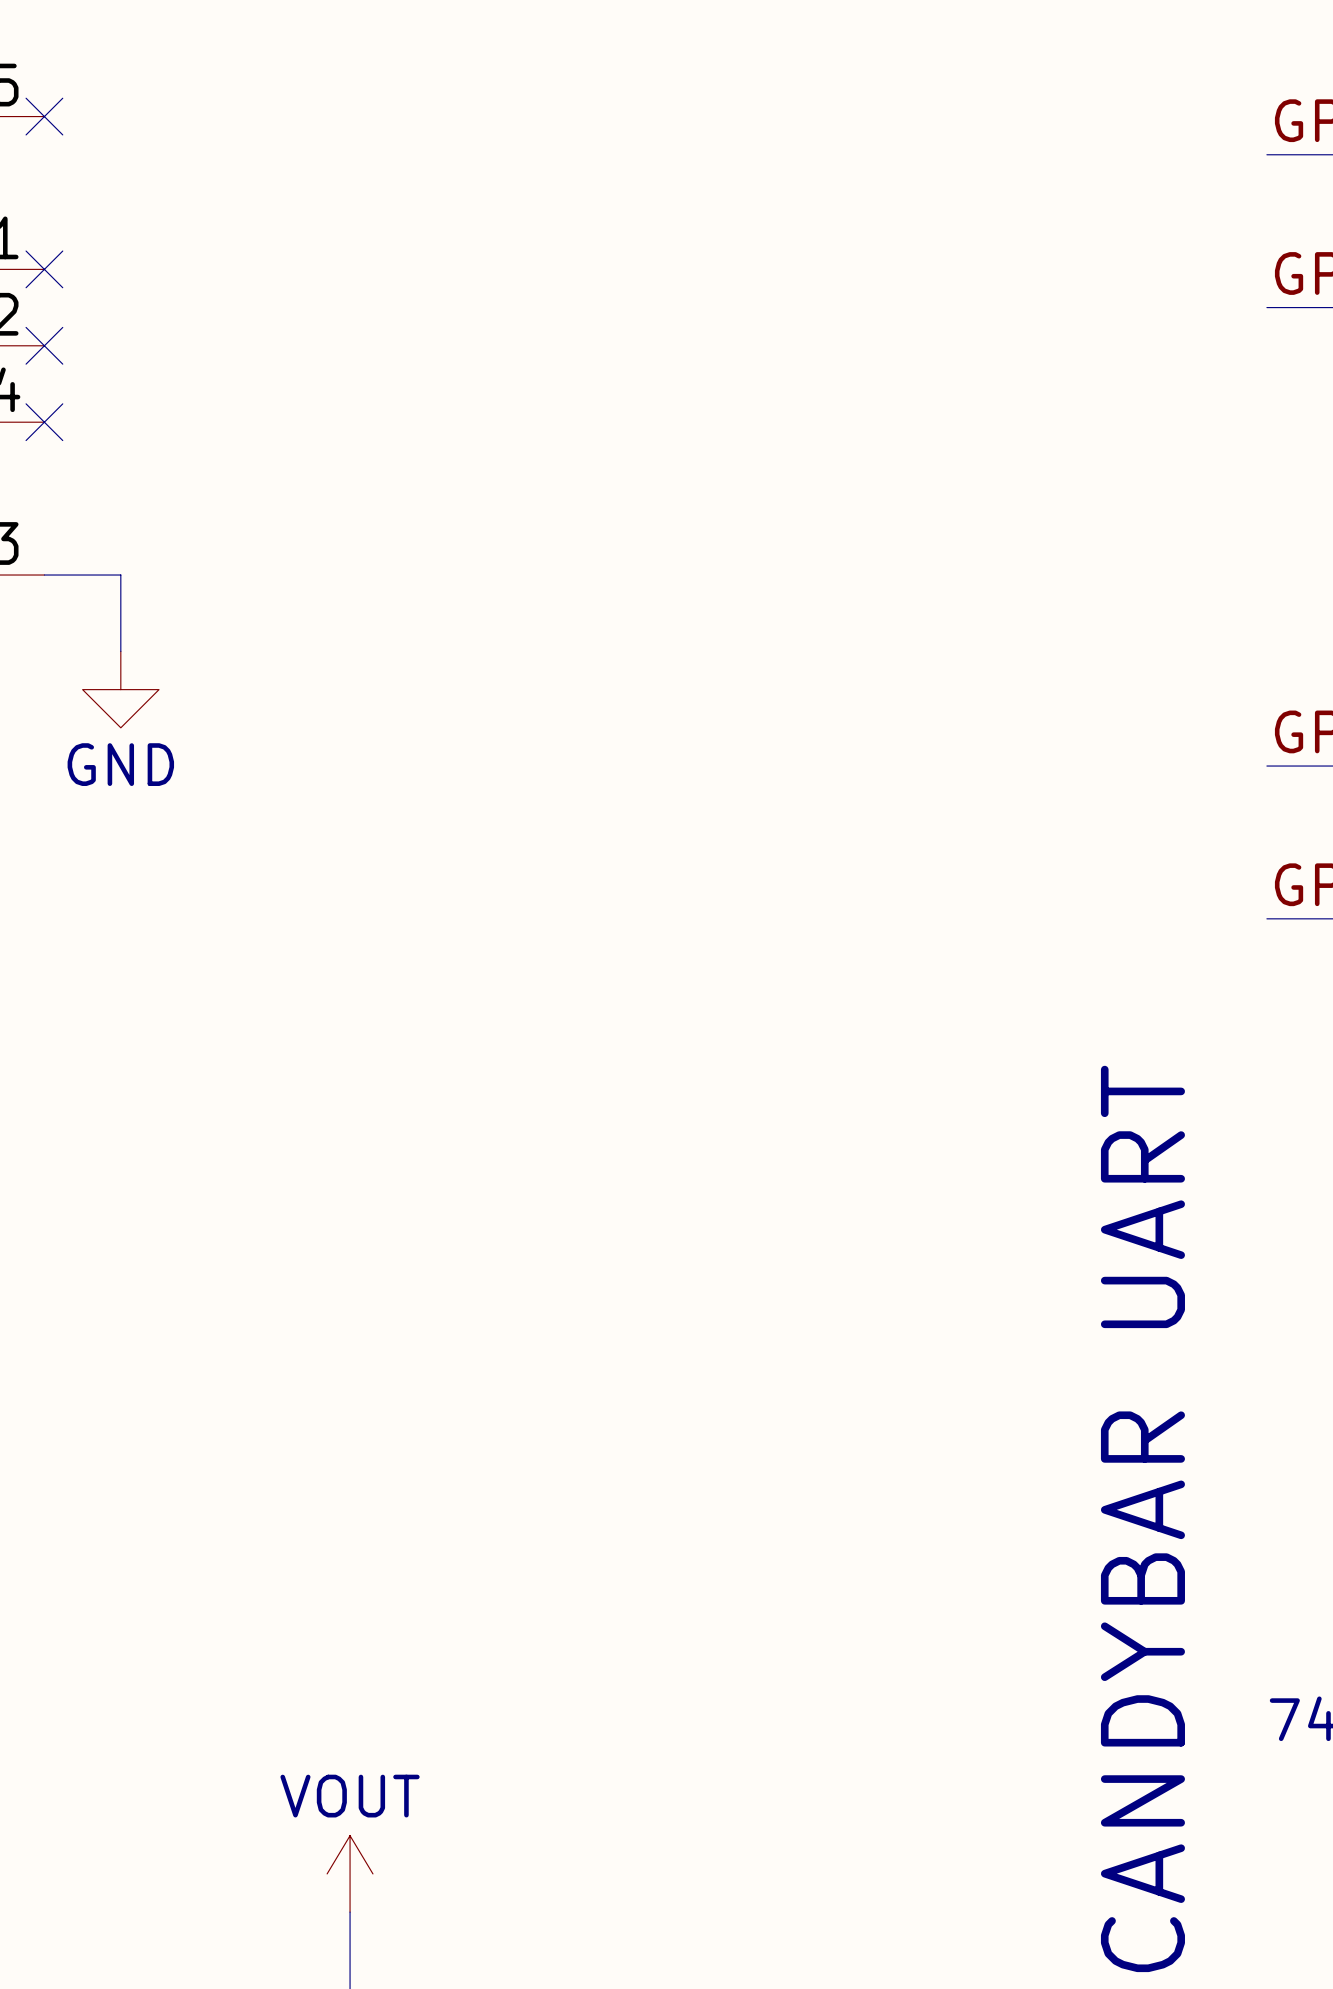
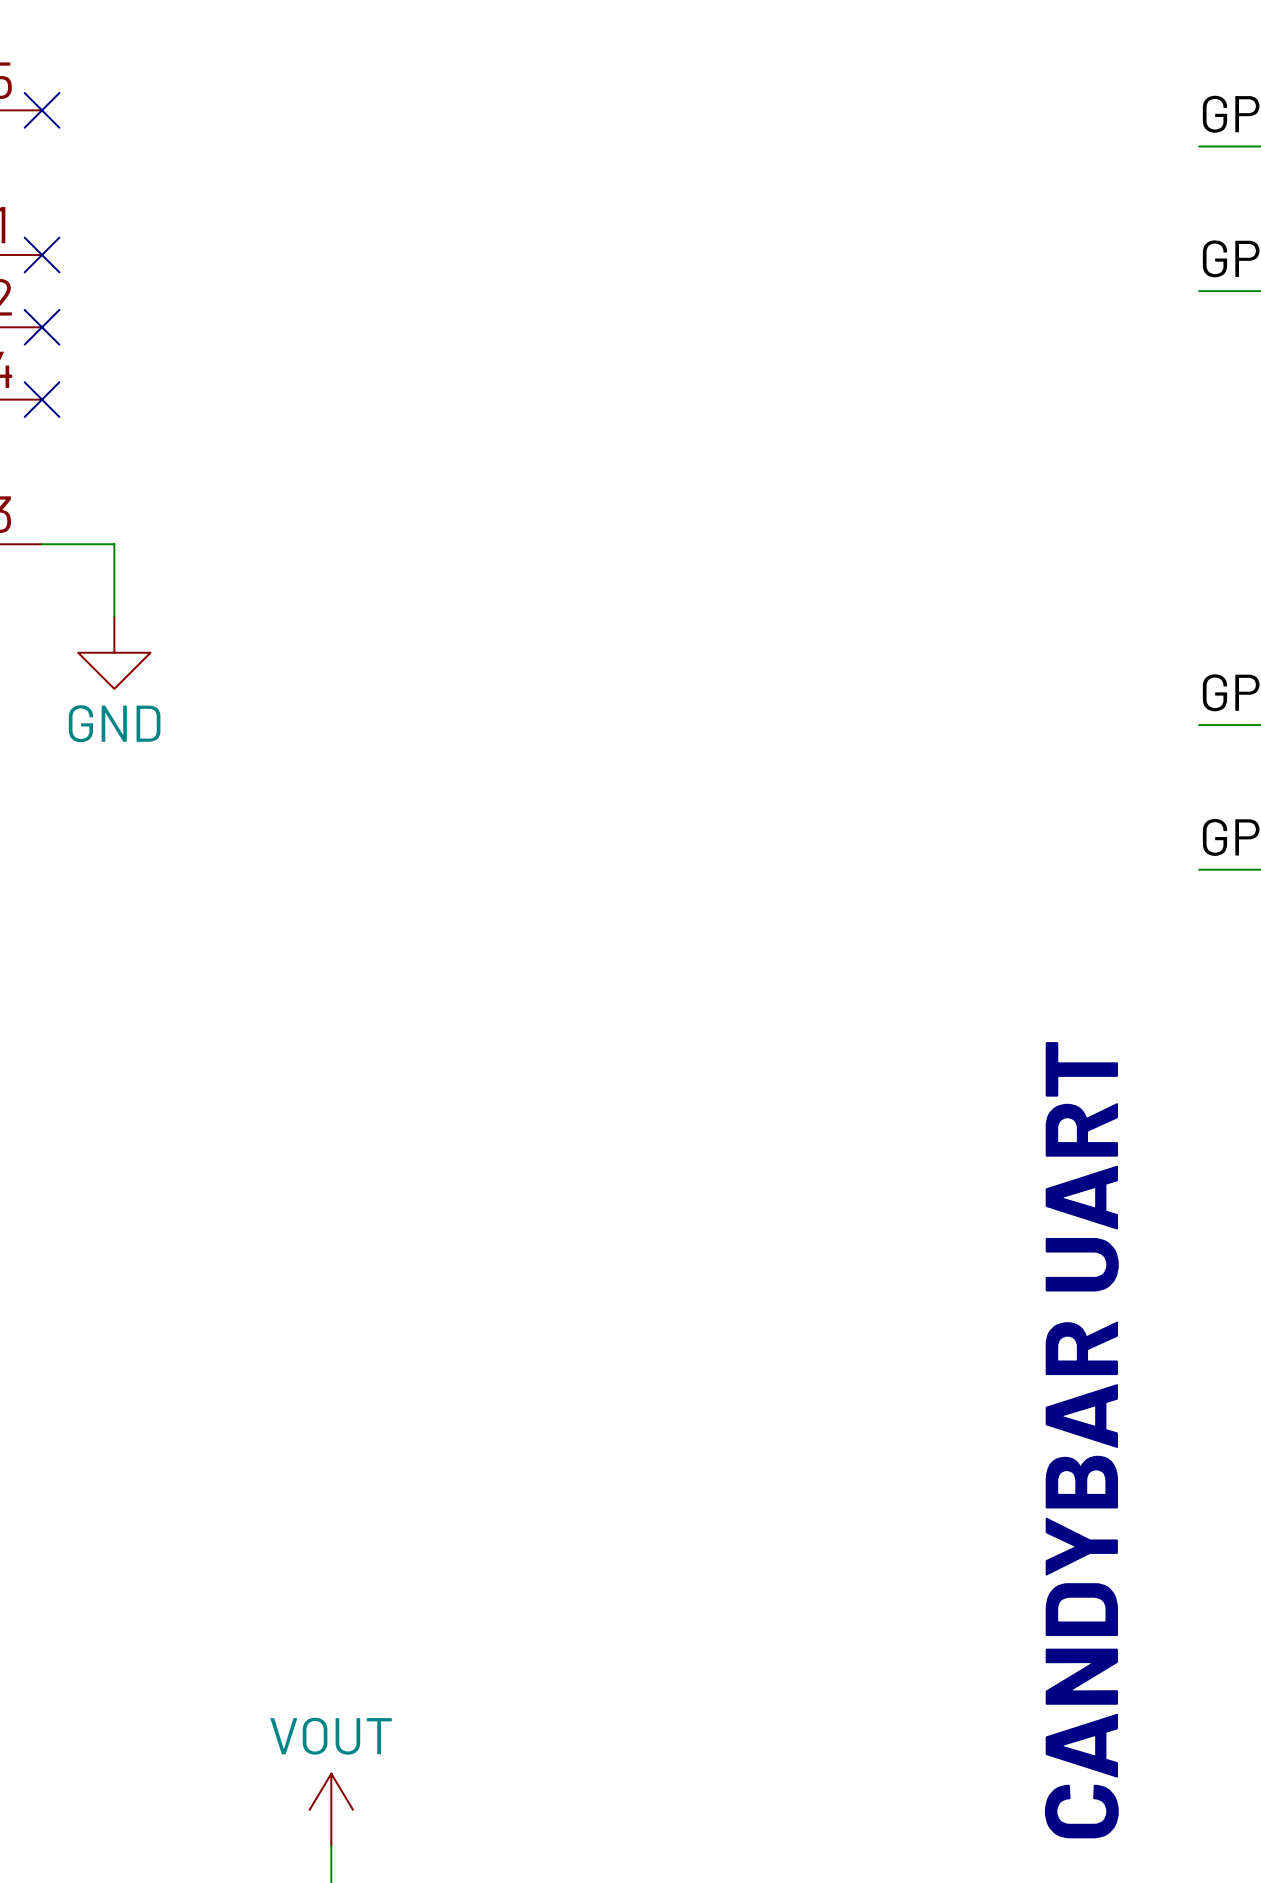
power symbol position: VOUT (350, 1873) -> VOUT (331, 1809)

